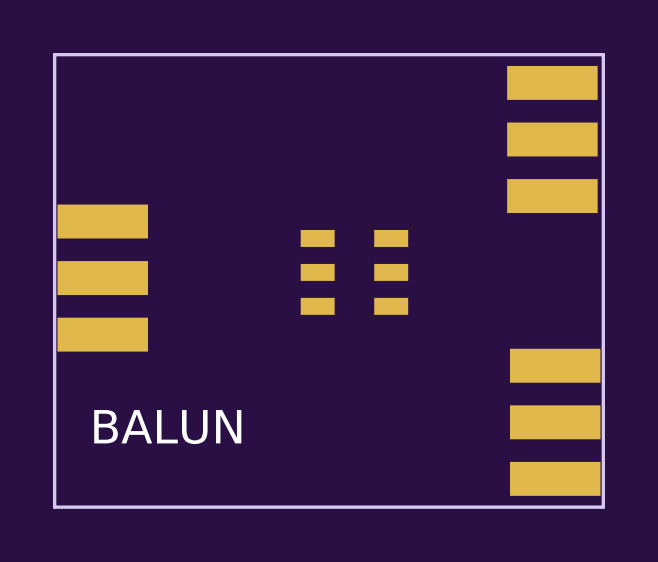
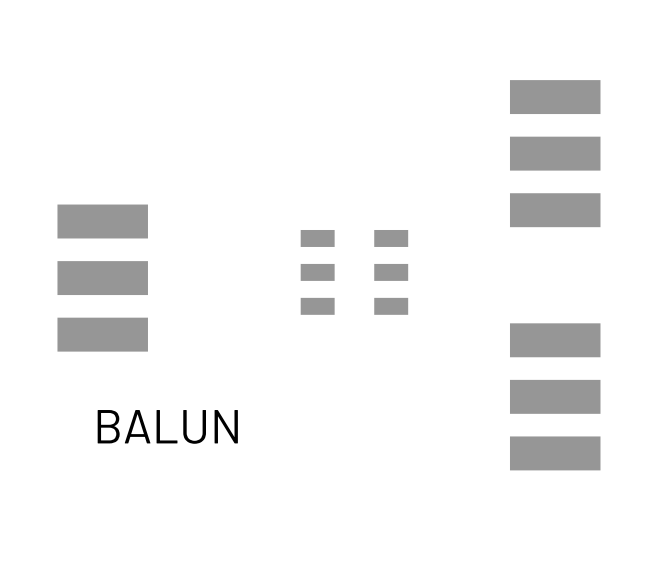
board edge: (54, 54) (54, 507) (603, 507) (603, 54) (54, 54) -> none
part position: (552, 139) -> (555, 153)
part position: (555, 422) -> (555, 396)

